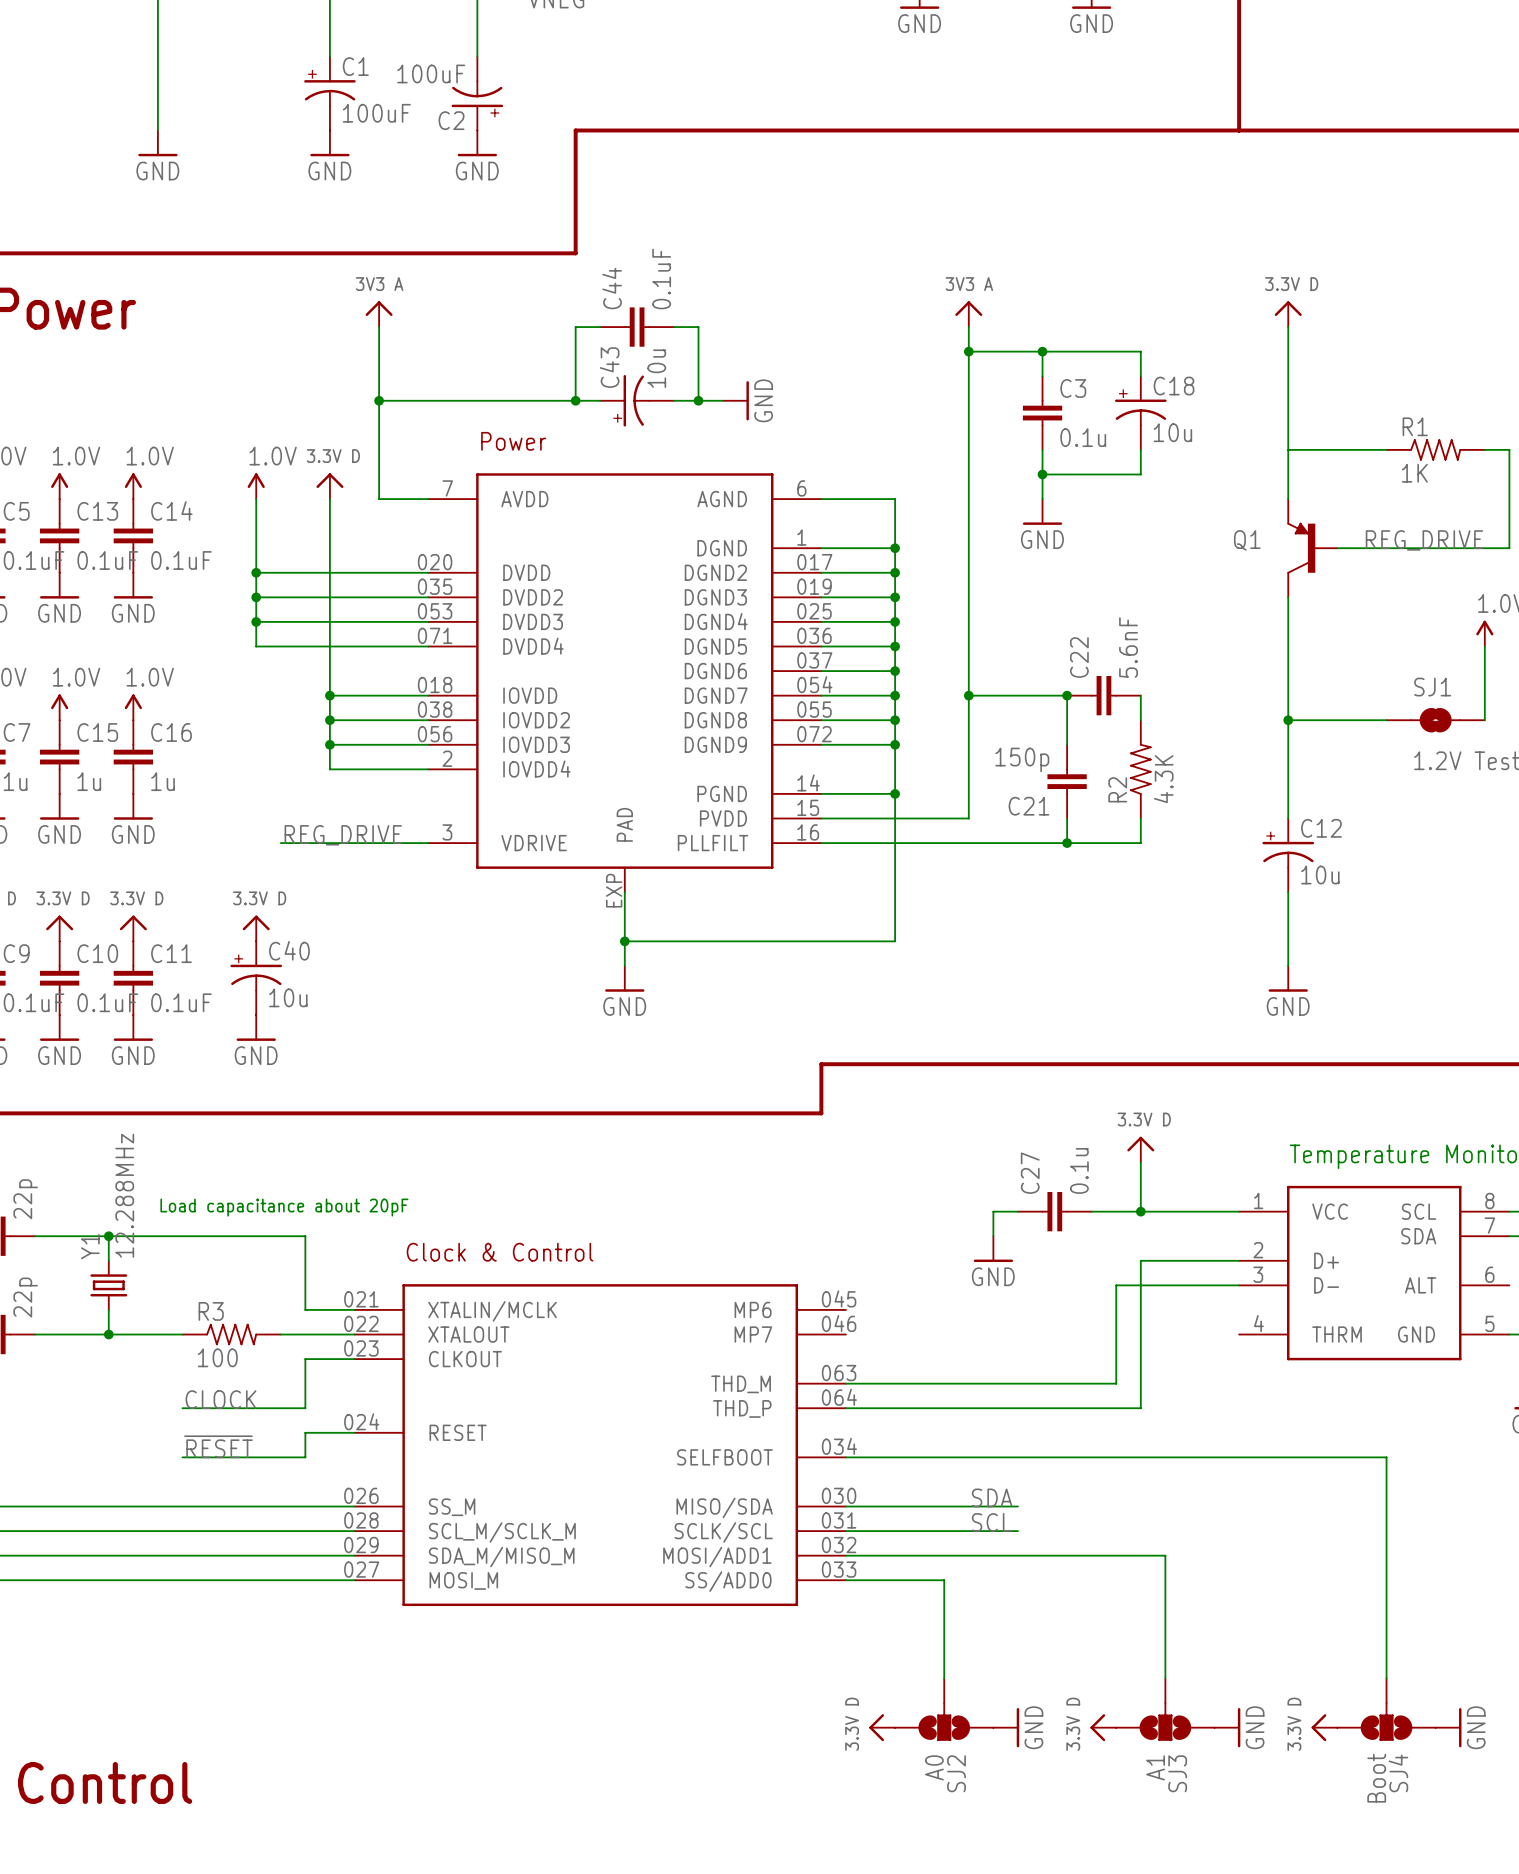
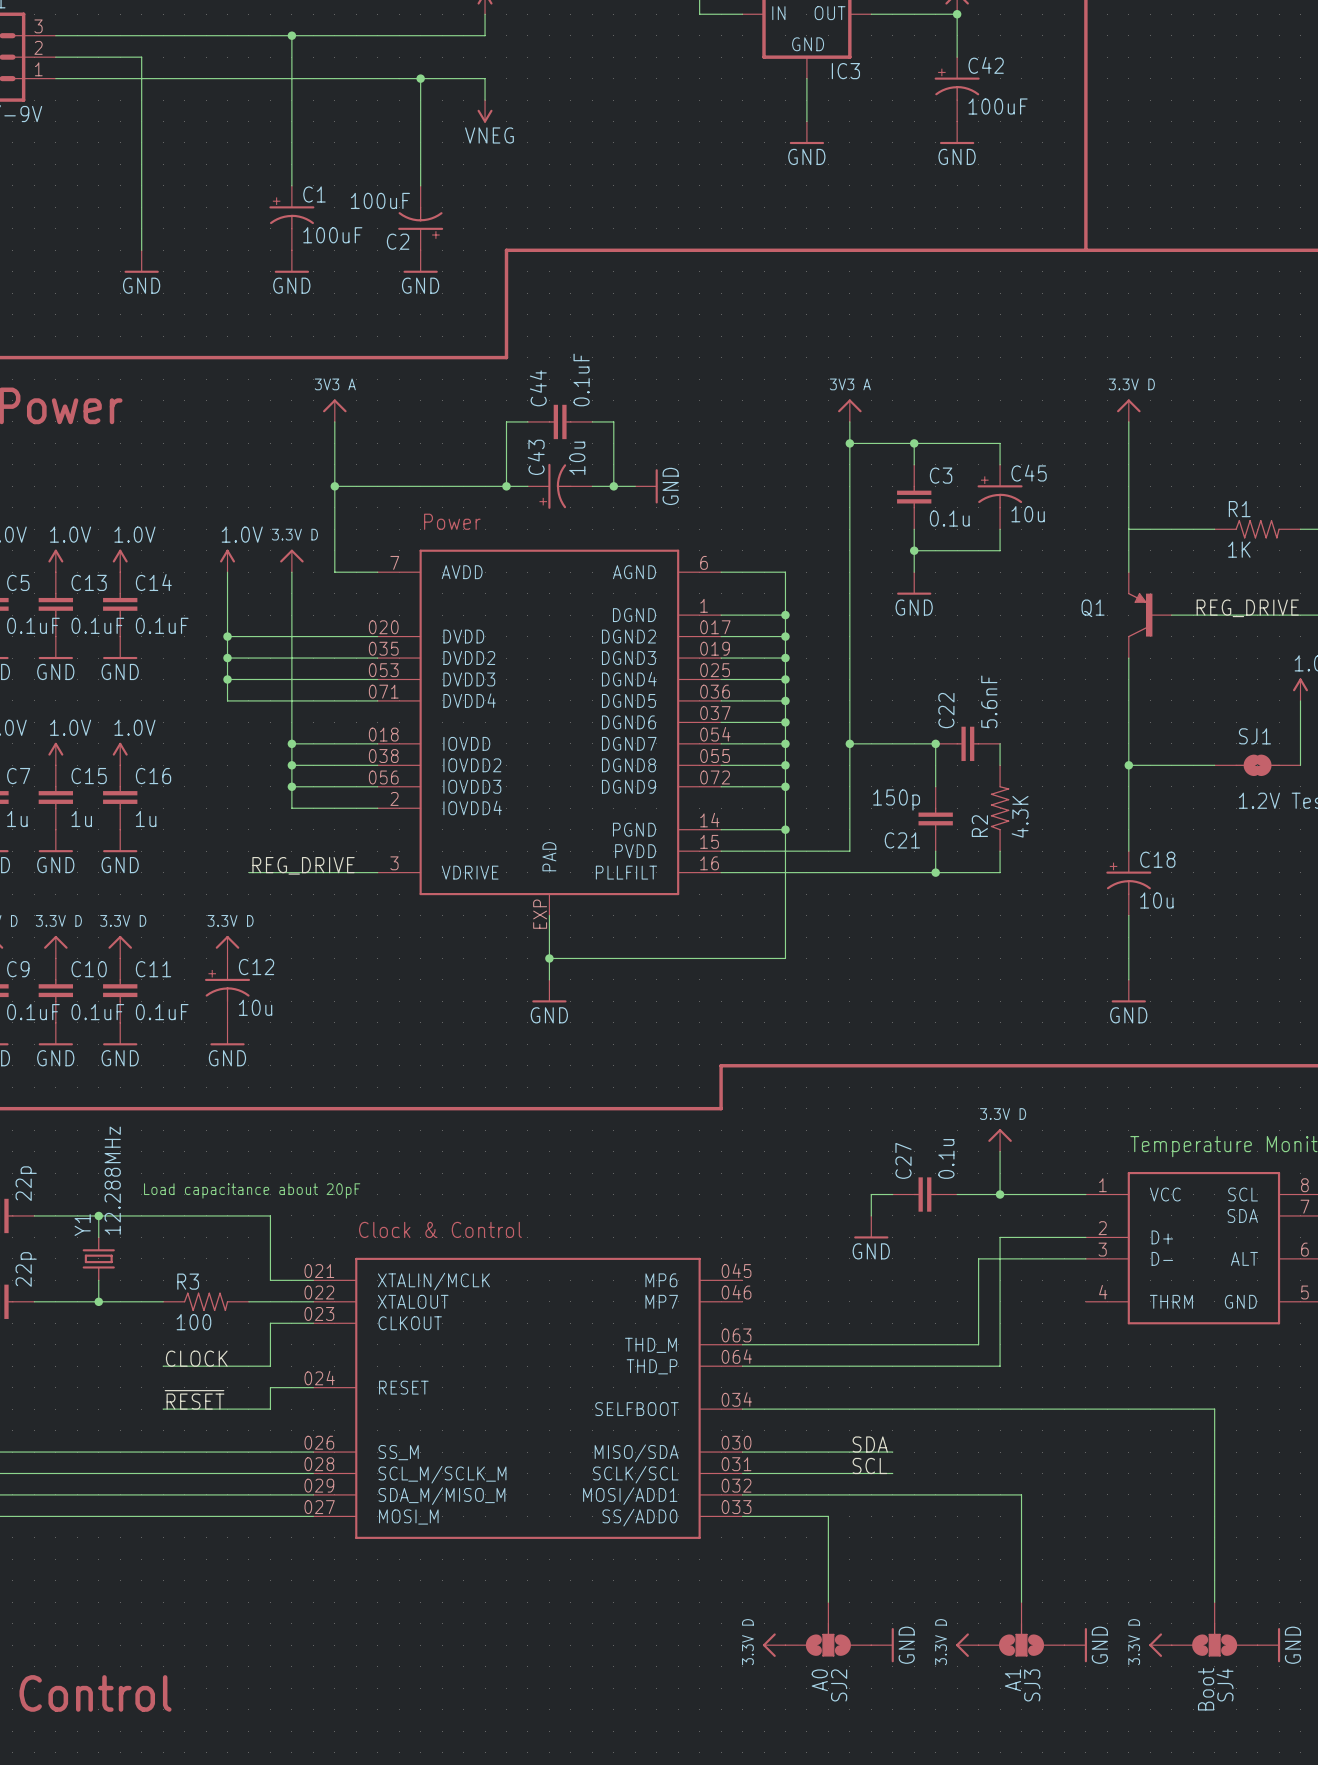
C18 name: C18 (1174, 386) -> C45 (1029, 473)
C12 name: C12 (1321, 828) -> C18 (1157, 859)
C40 name: C40 (289, 950) -> C12 (256, 967)

